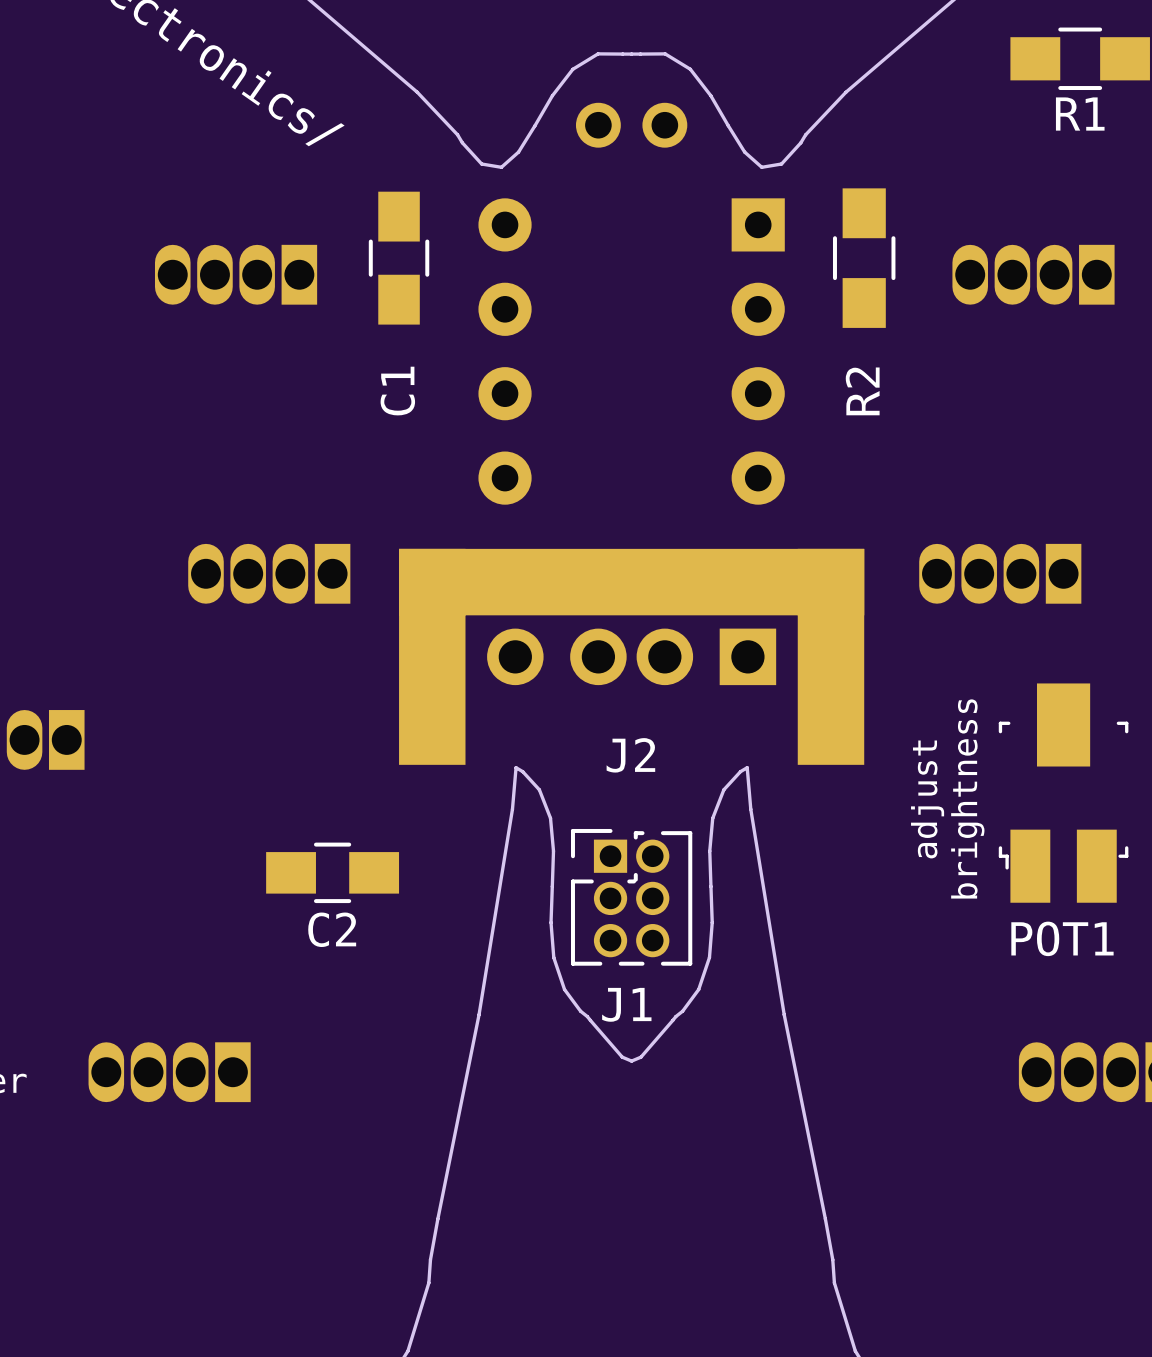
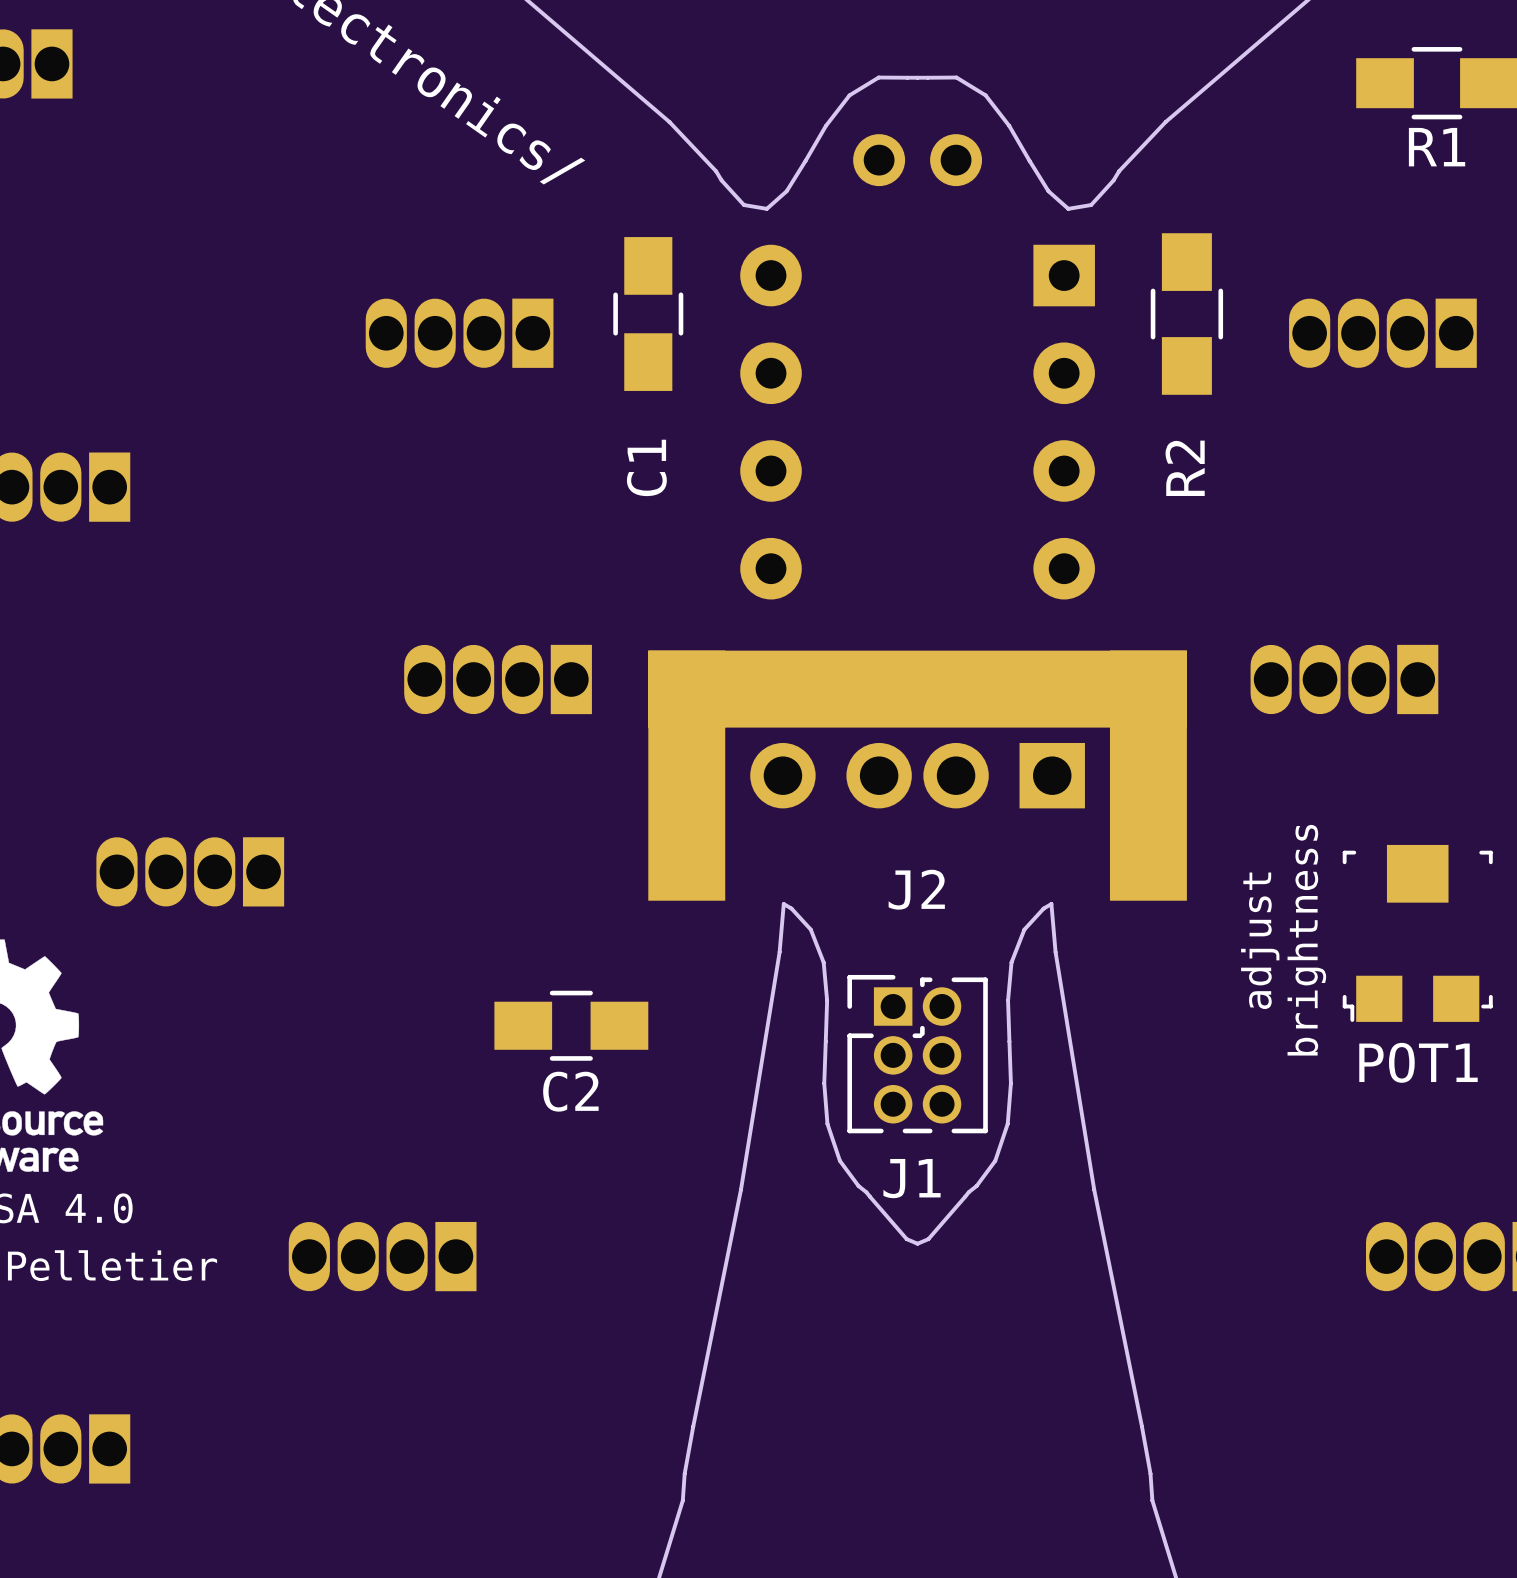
POT1 footprint: [998, 683, 1129, 903] -> [1342, 844, 1493, 1022]
POT1 name position: POT1 (1062, 938) -> POT1 (1418, 1062)

